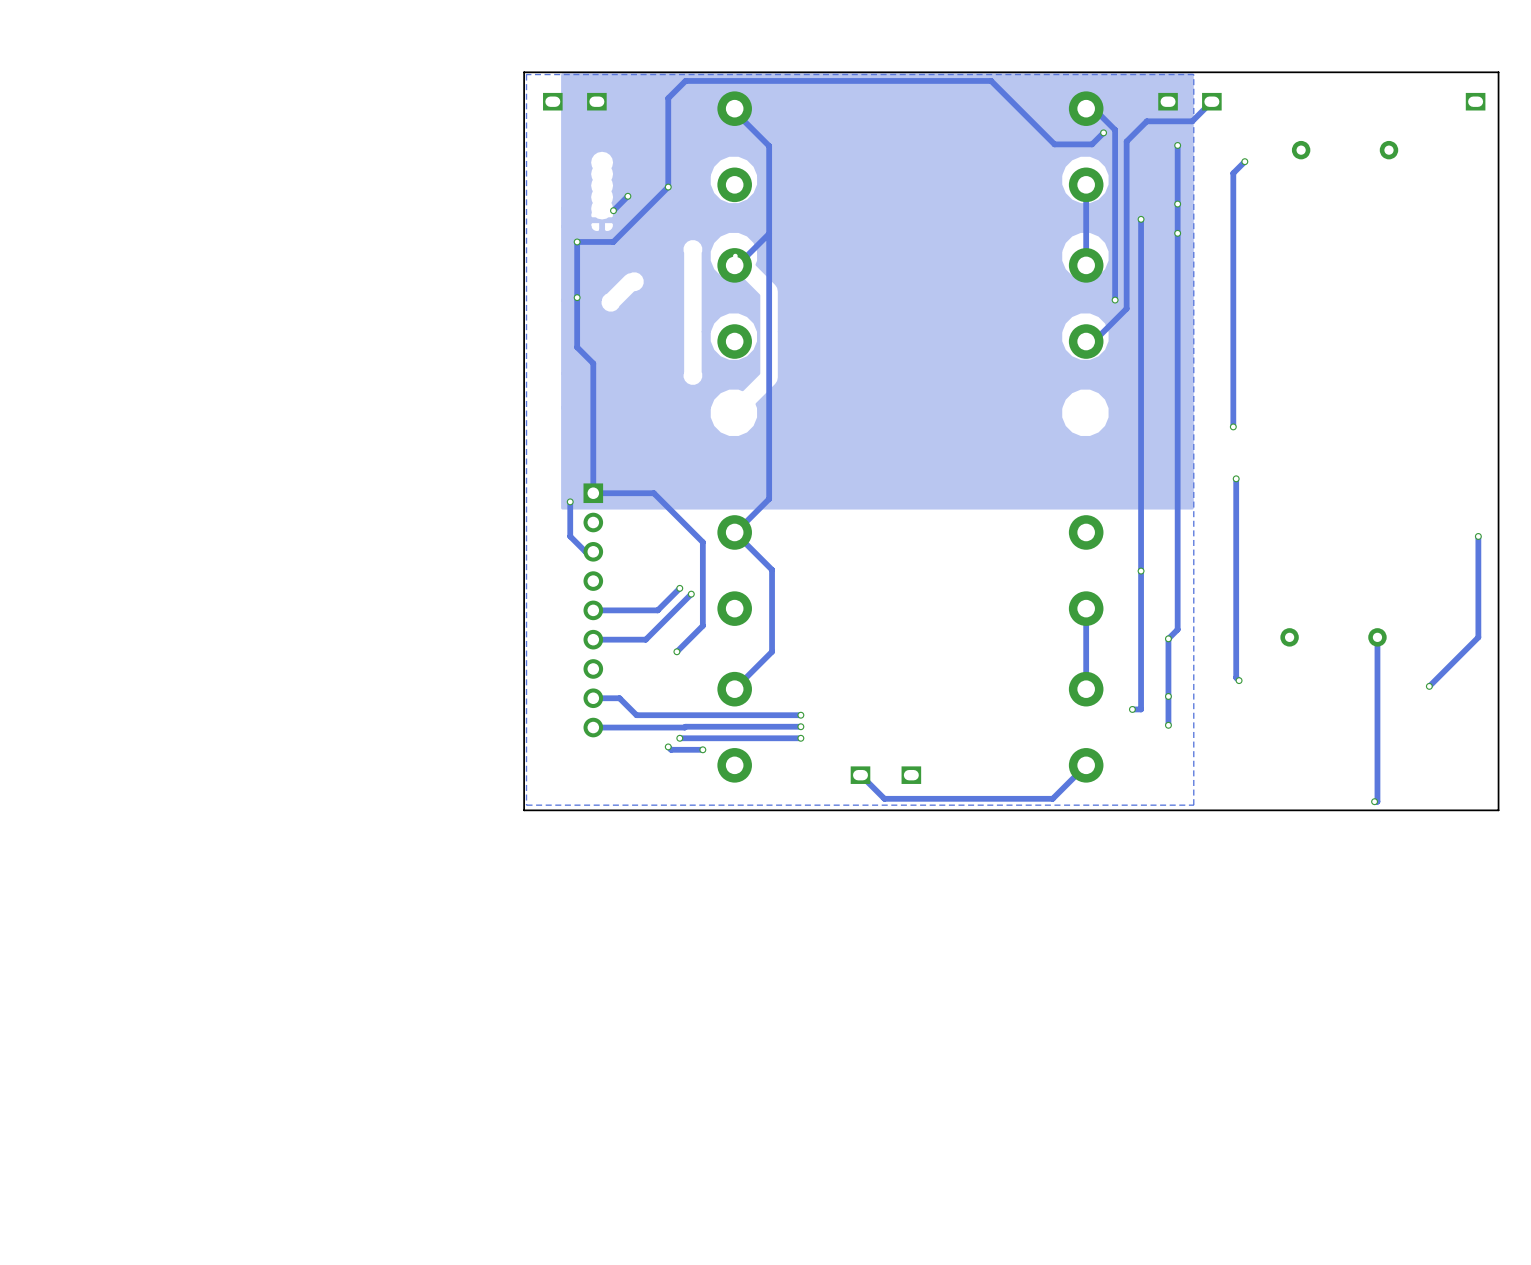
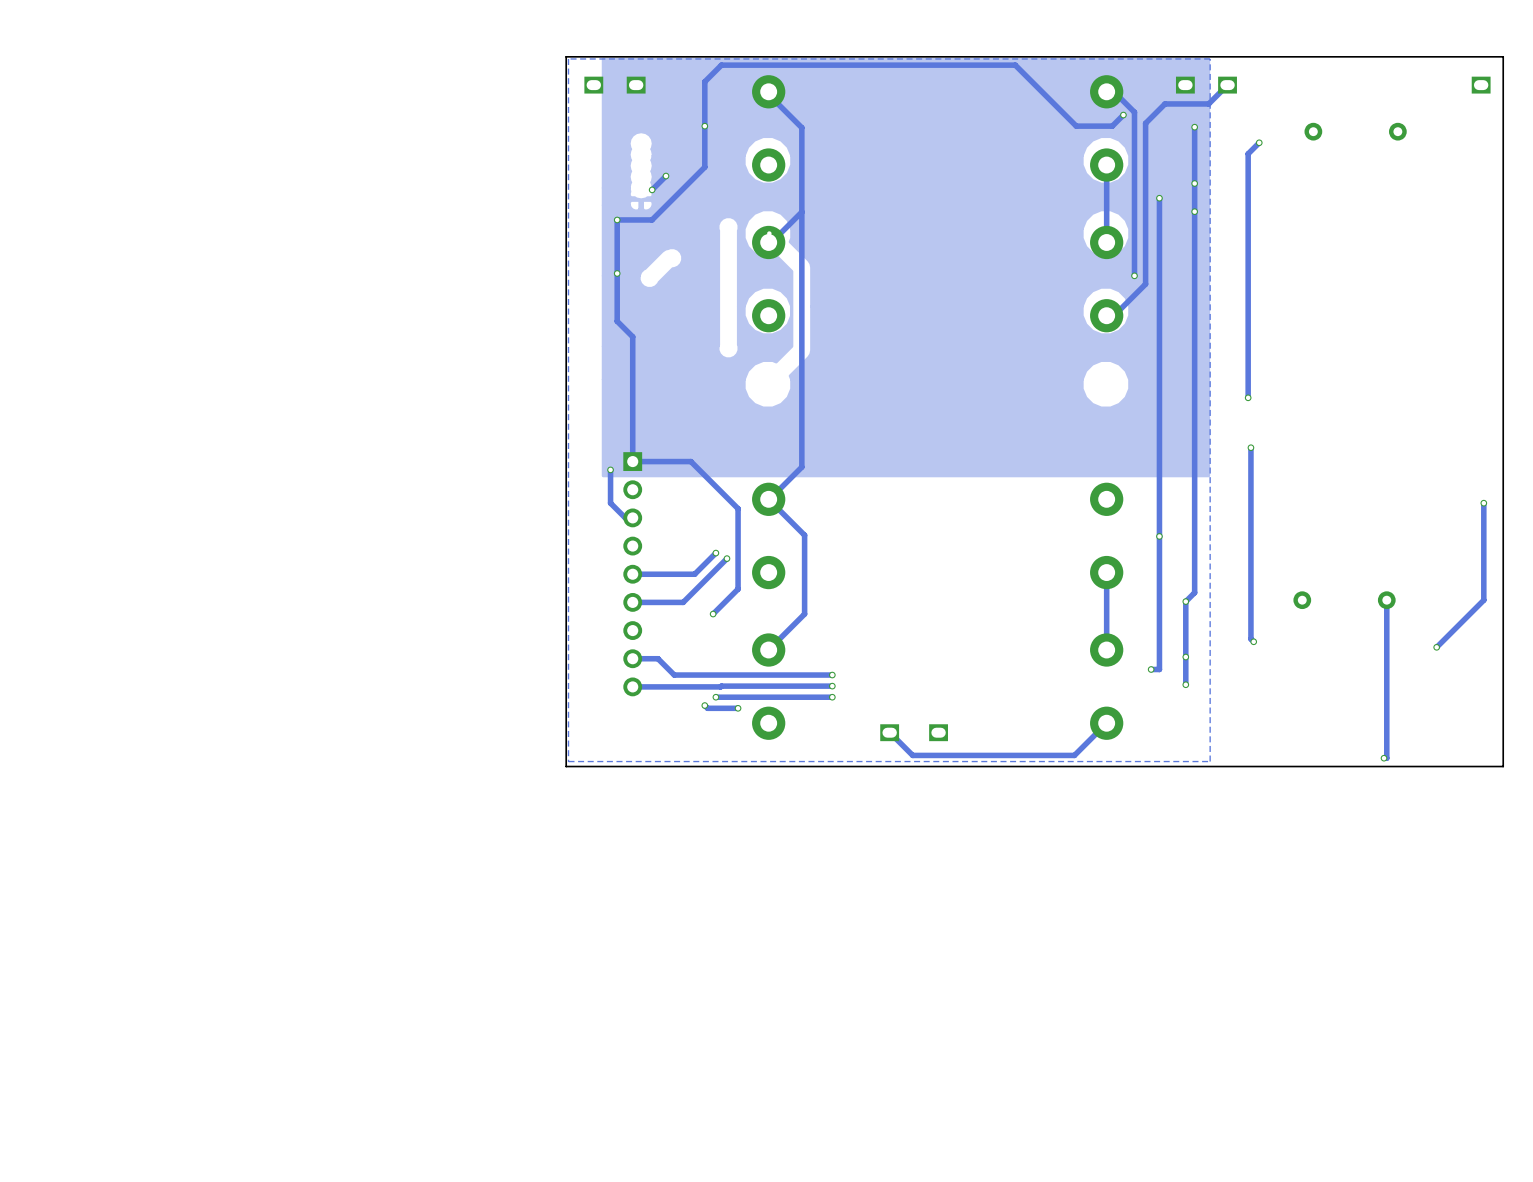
via position: (668, 187) -> (704, 126)

